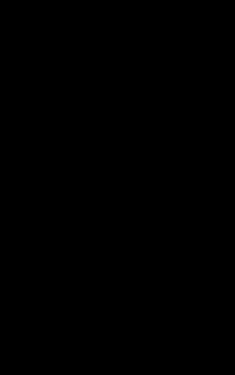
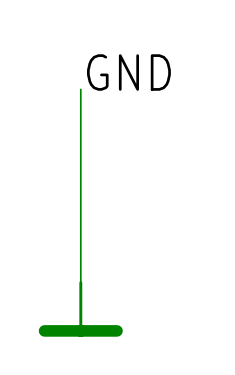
label: none -> GND (128, 72)
wire: none -> (80, 89) (80, 282)
power symbol: none -> (80, 308)

